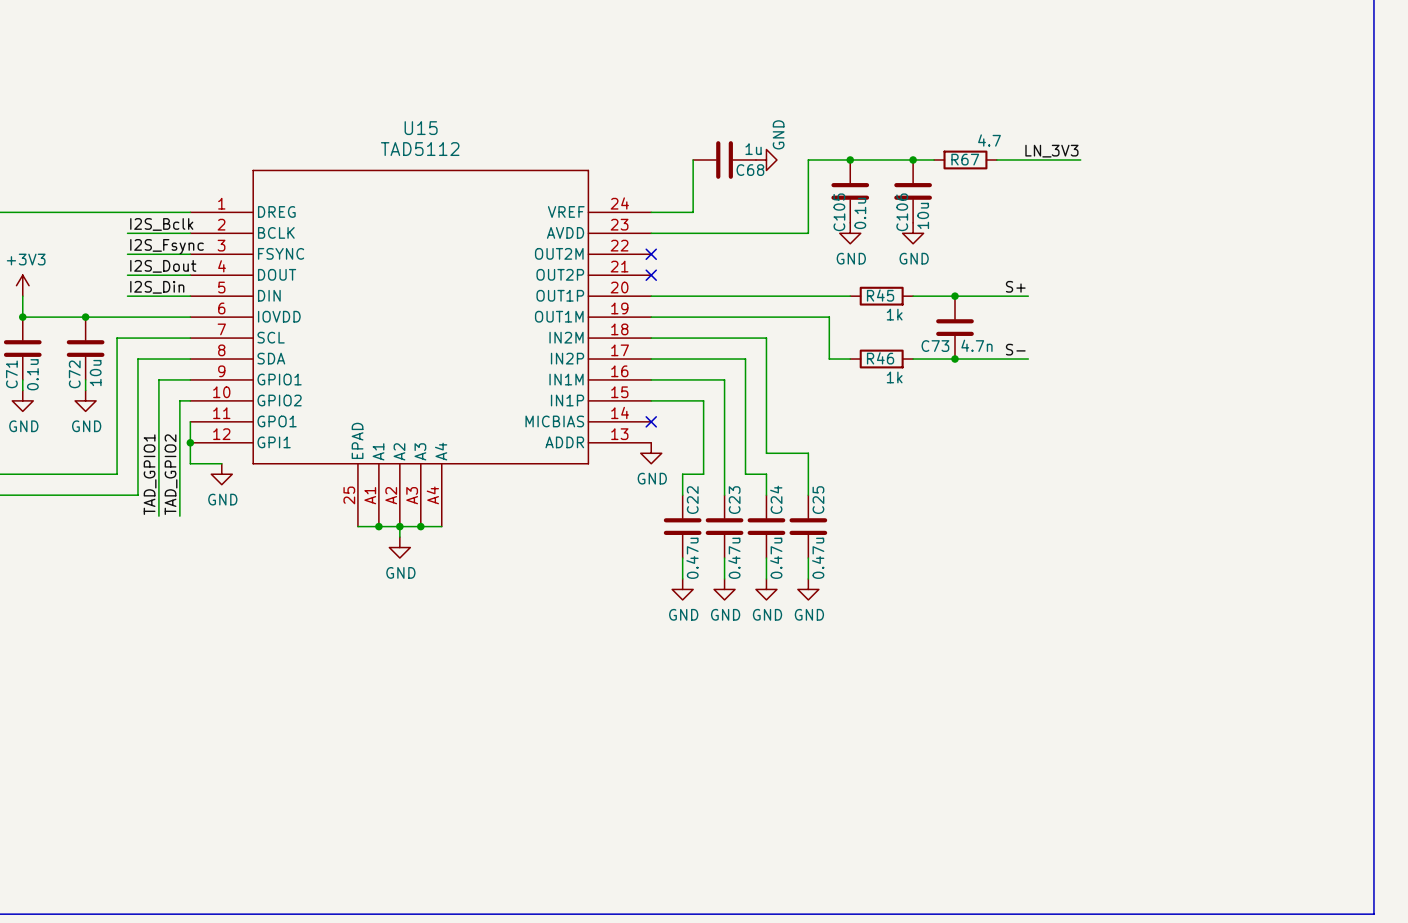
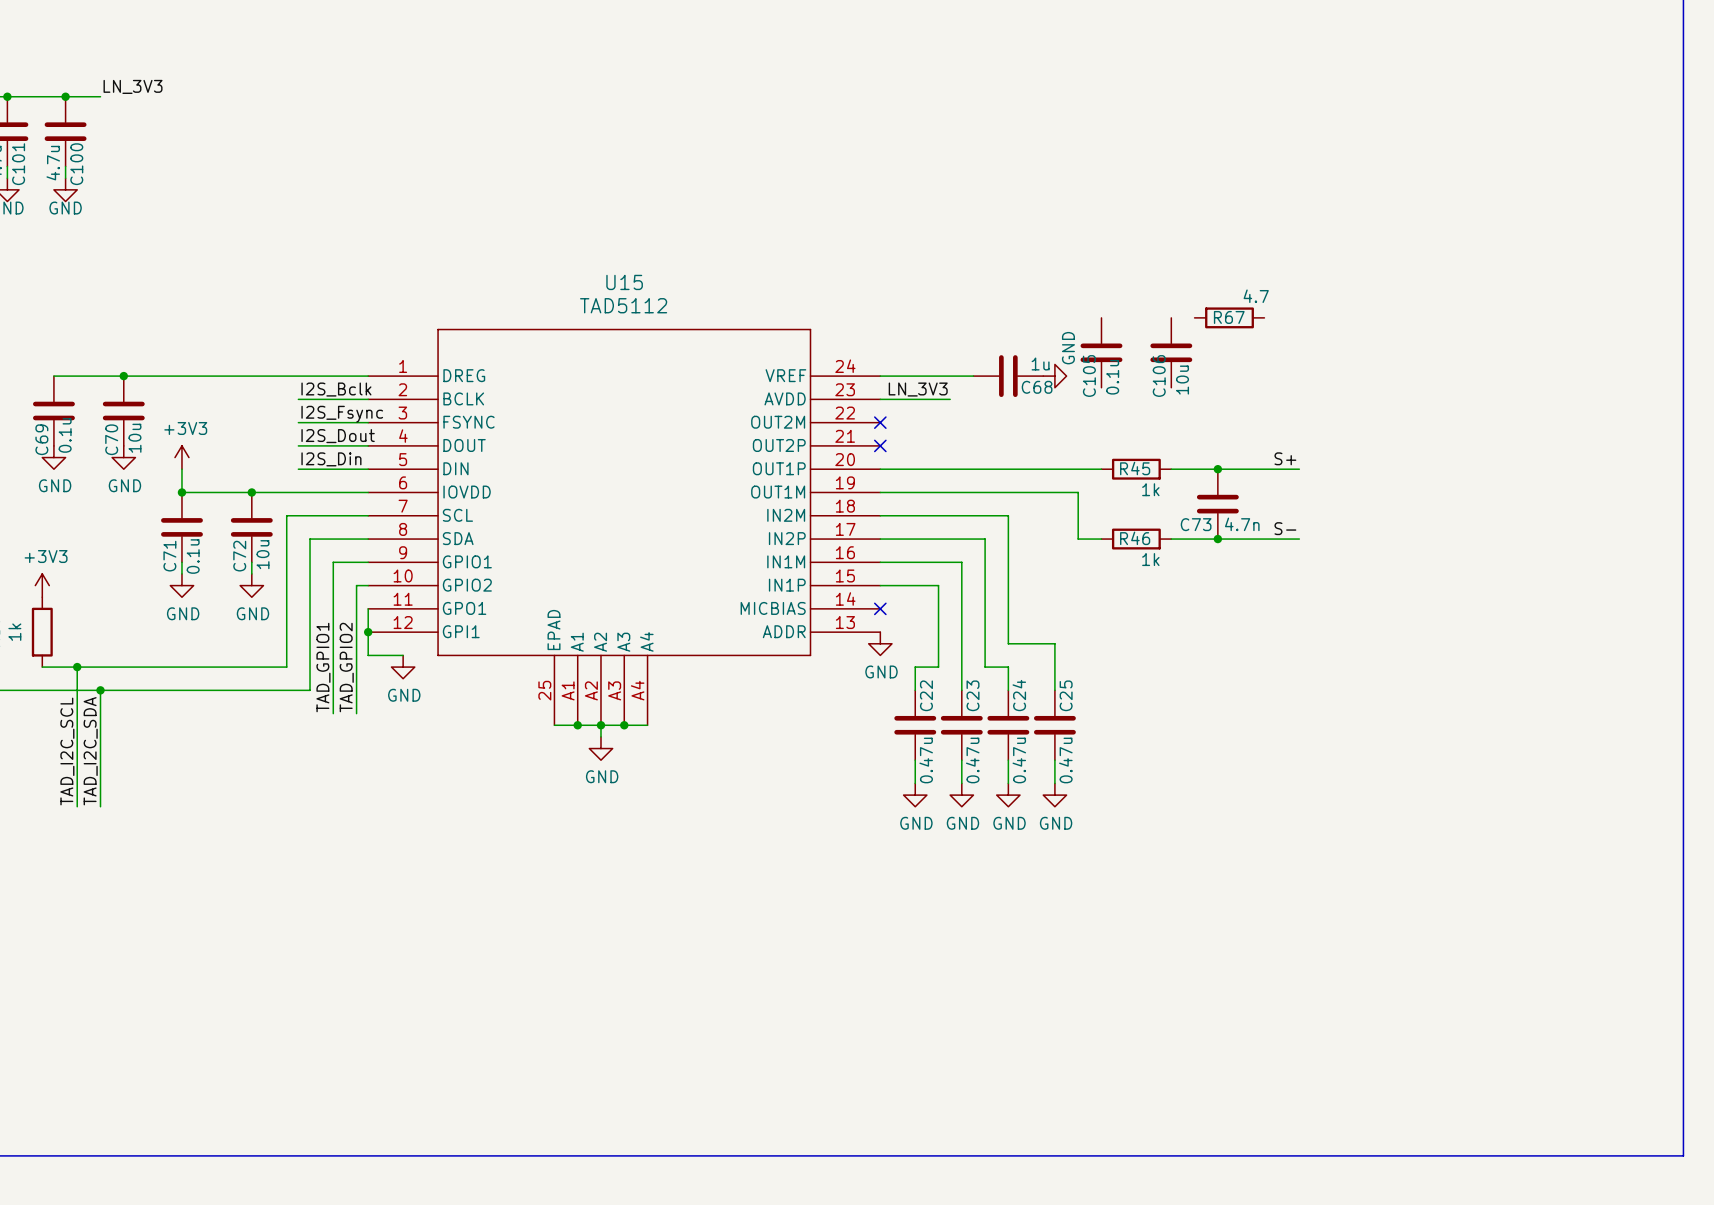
label: LN_3V3 (1051, 151) -> none
wire: (693, 159) (693, 212) -> (973, 376) (926, 376)
C68 position: (724, 159) -> (1008, 376)
power symbol: GND (766, 159) -> none
junction: (850, 159) -> none
junction: (913, 159) -> none
wire: (934, 159) (808, 159) (808, 233) (714, 233) -> none
wire: (996, 159) (1080, 159) -> none
power symbol: none -> GND (1054, 376)
label: none -> LN_3V3 (918, 389)
power symbol: GND (850, 233) -> none
power symbol: GND (913, 233) -> none

